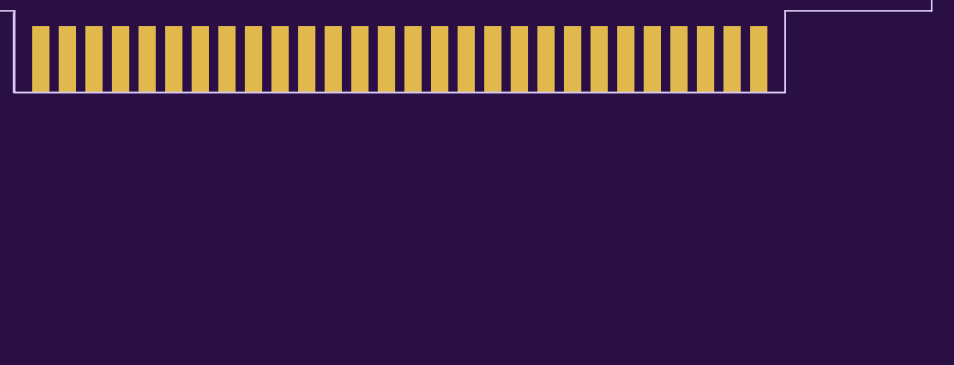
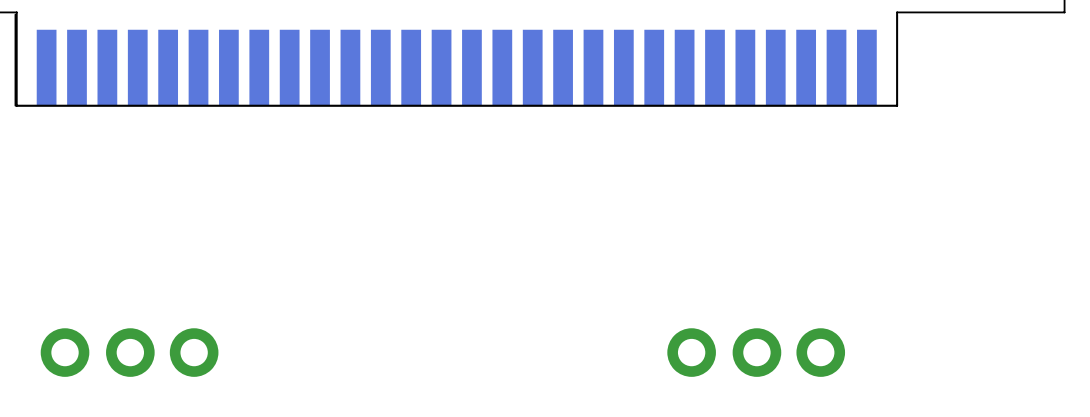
part: none -> (129, 352)
part: none -> (756, 352)

